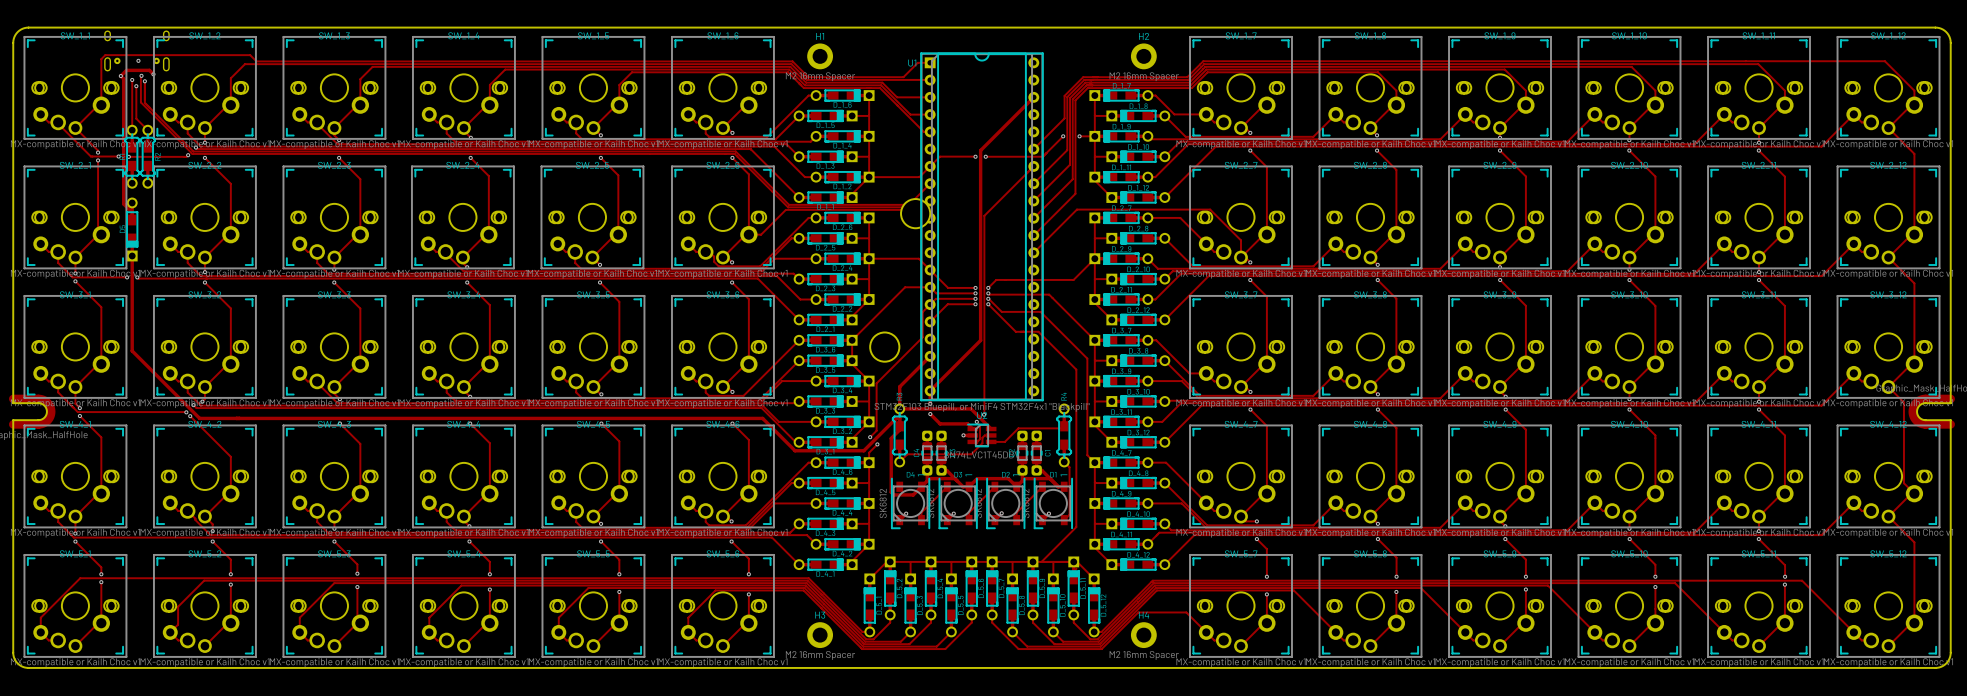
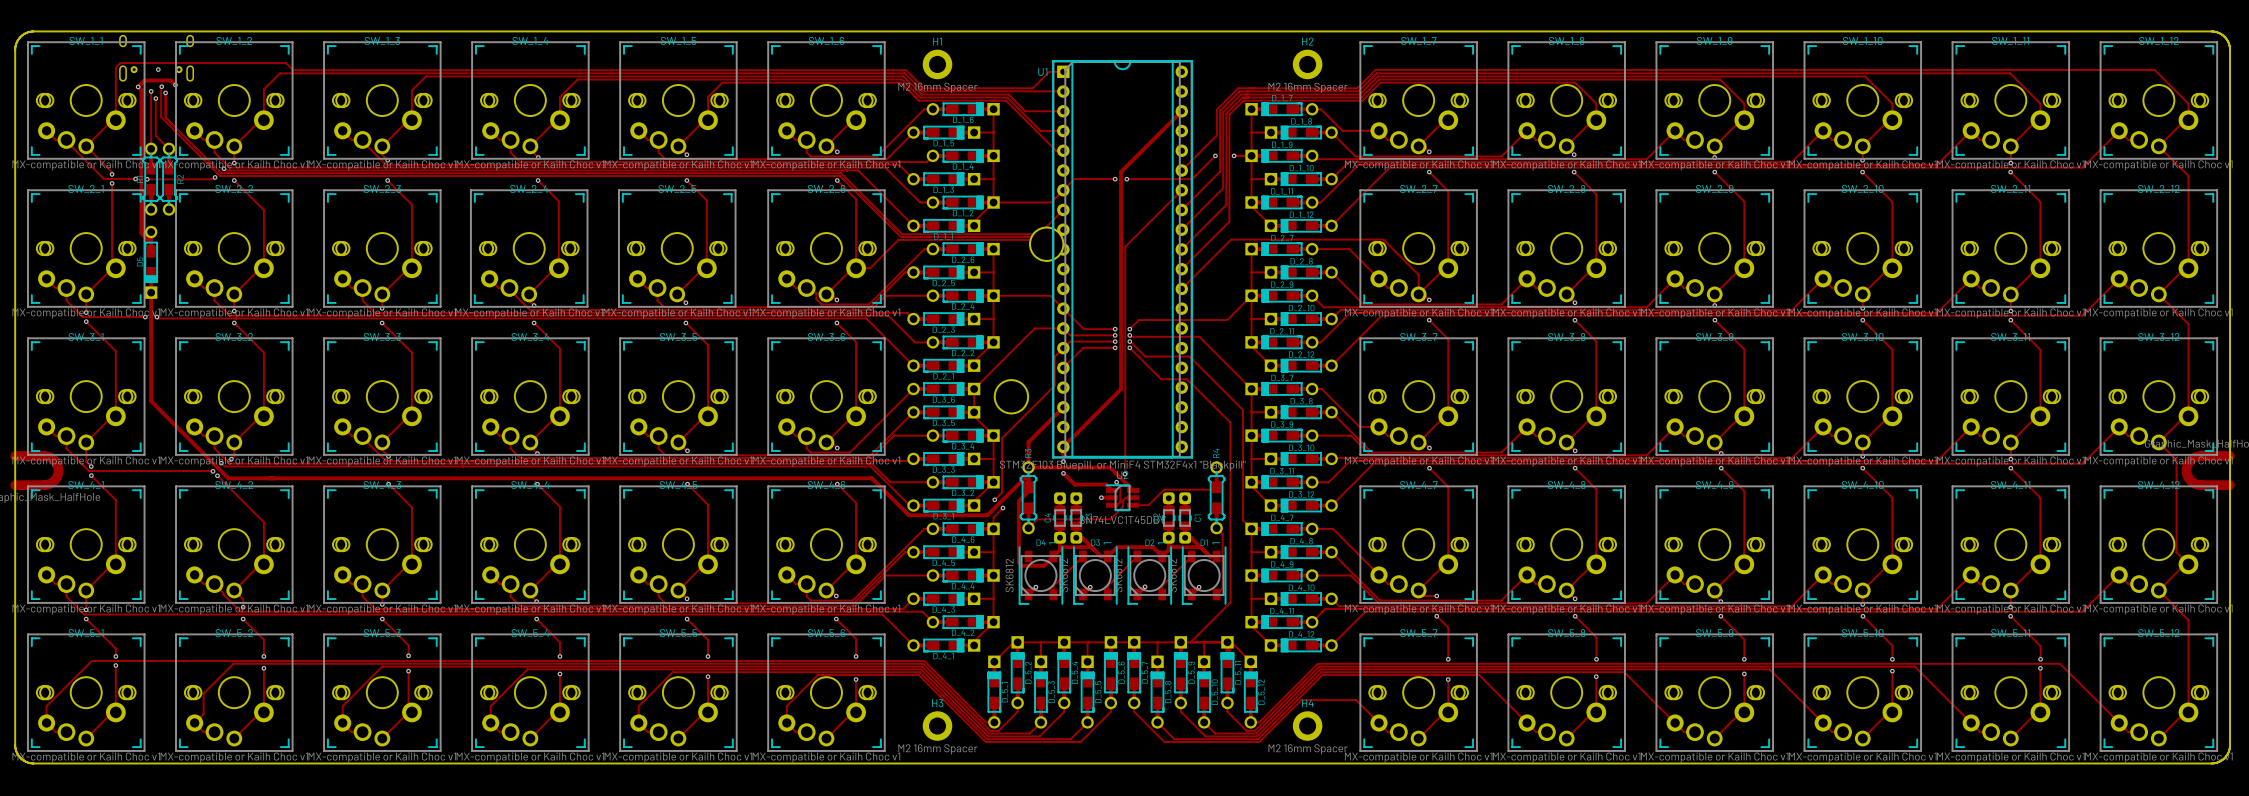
board edge: (28, 27) (1939, 28) (1947, 33) (1950, 42) (1950, 403) (1923, 403) (1918, 406) (1917, 411) (1918, 416) (1923, 419) (1950, 420) (1950, 656) (1944, 664) (1935, 667) (24, 667) (16, 661) (13, 652) (13, 420) (40, 419) (45, 416) (46, 411) (45, 406) (40, 403) (13, 403) (13, 42) (17, 32) (28, 27) -> (32, 31) (19, 37) (15, 49) (15, 744) (18, 755) (28, 762) (2211, 763) (2222, 759) (2229, 750) (2230, 49) (2226, 38) (2216, 32) (32, 31)

